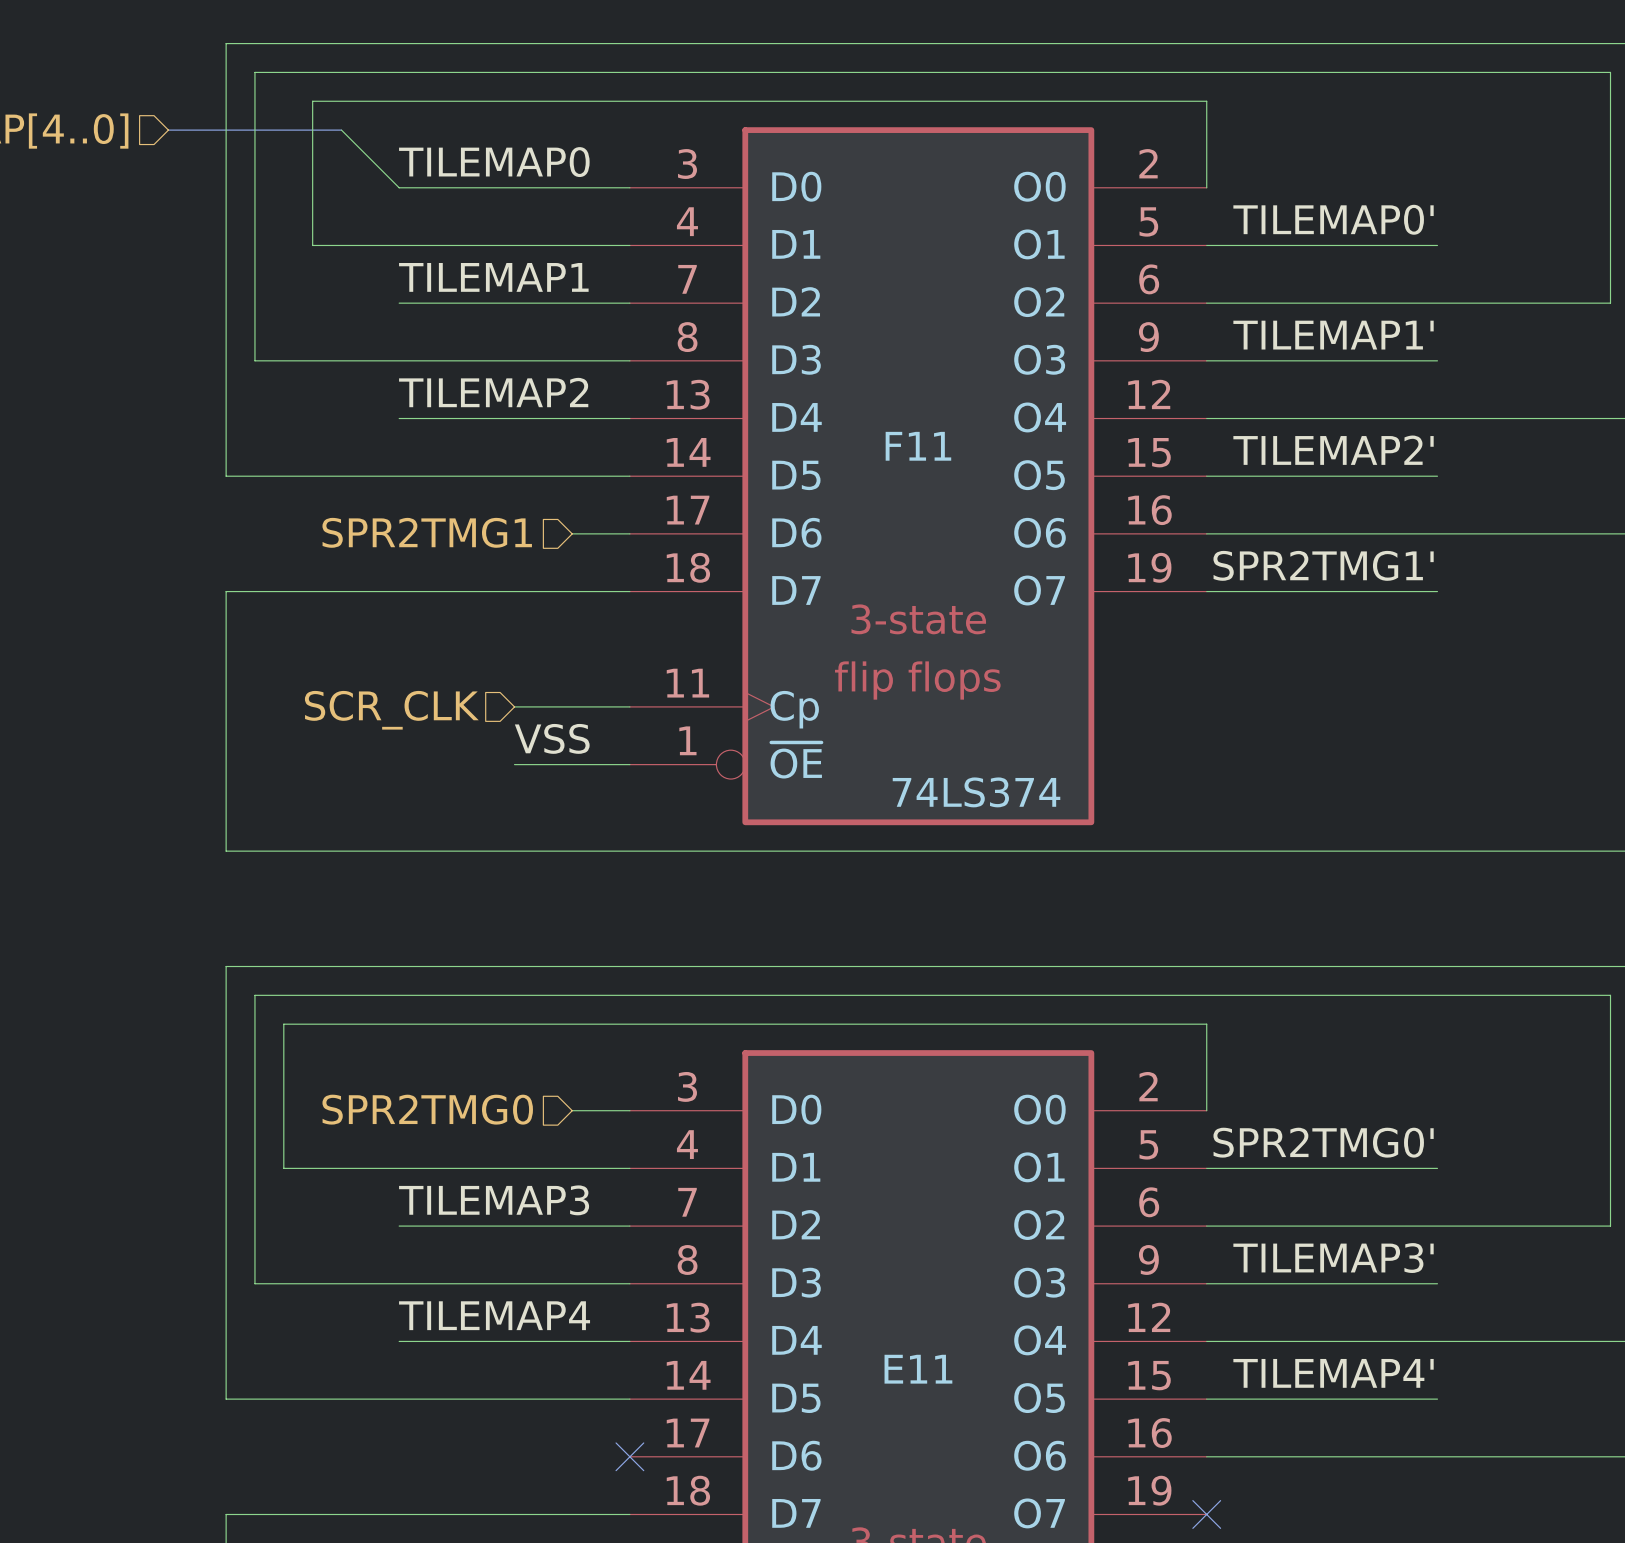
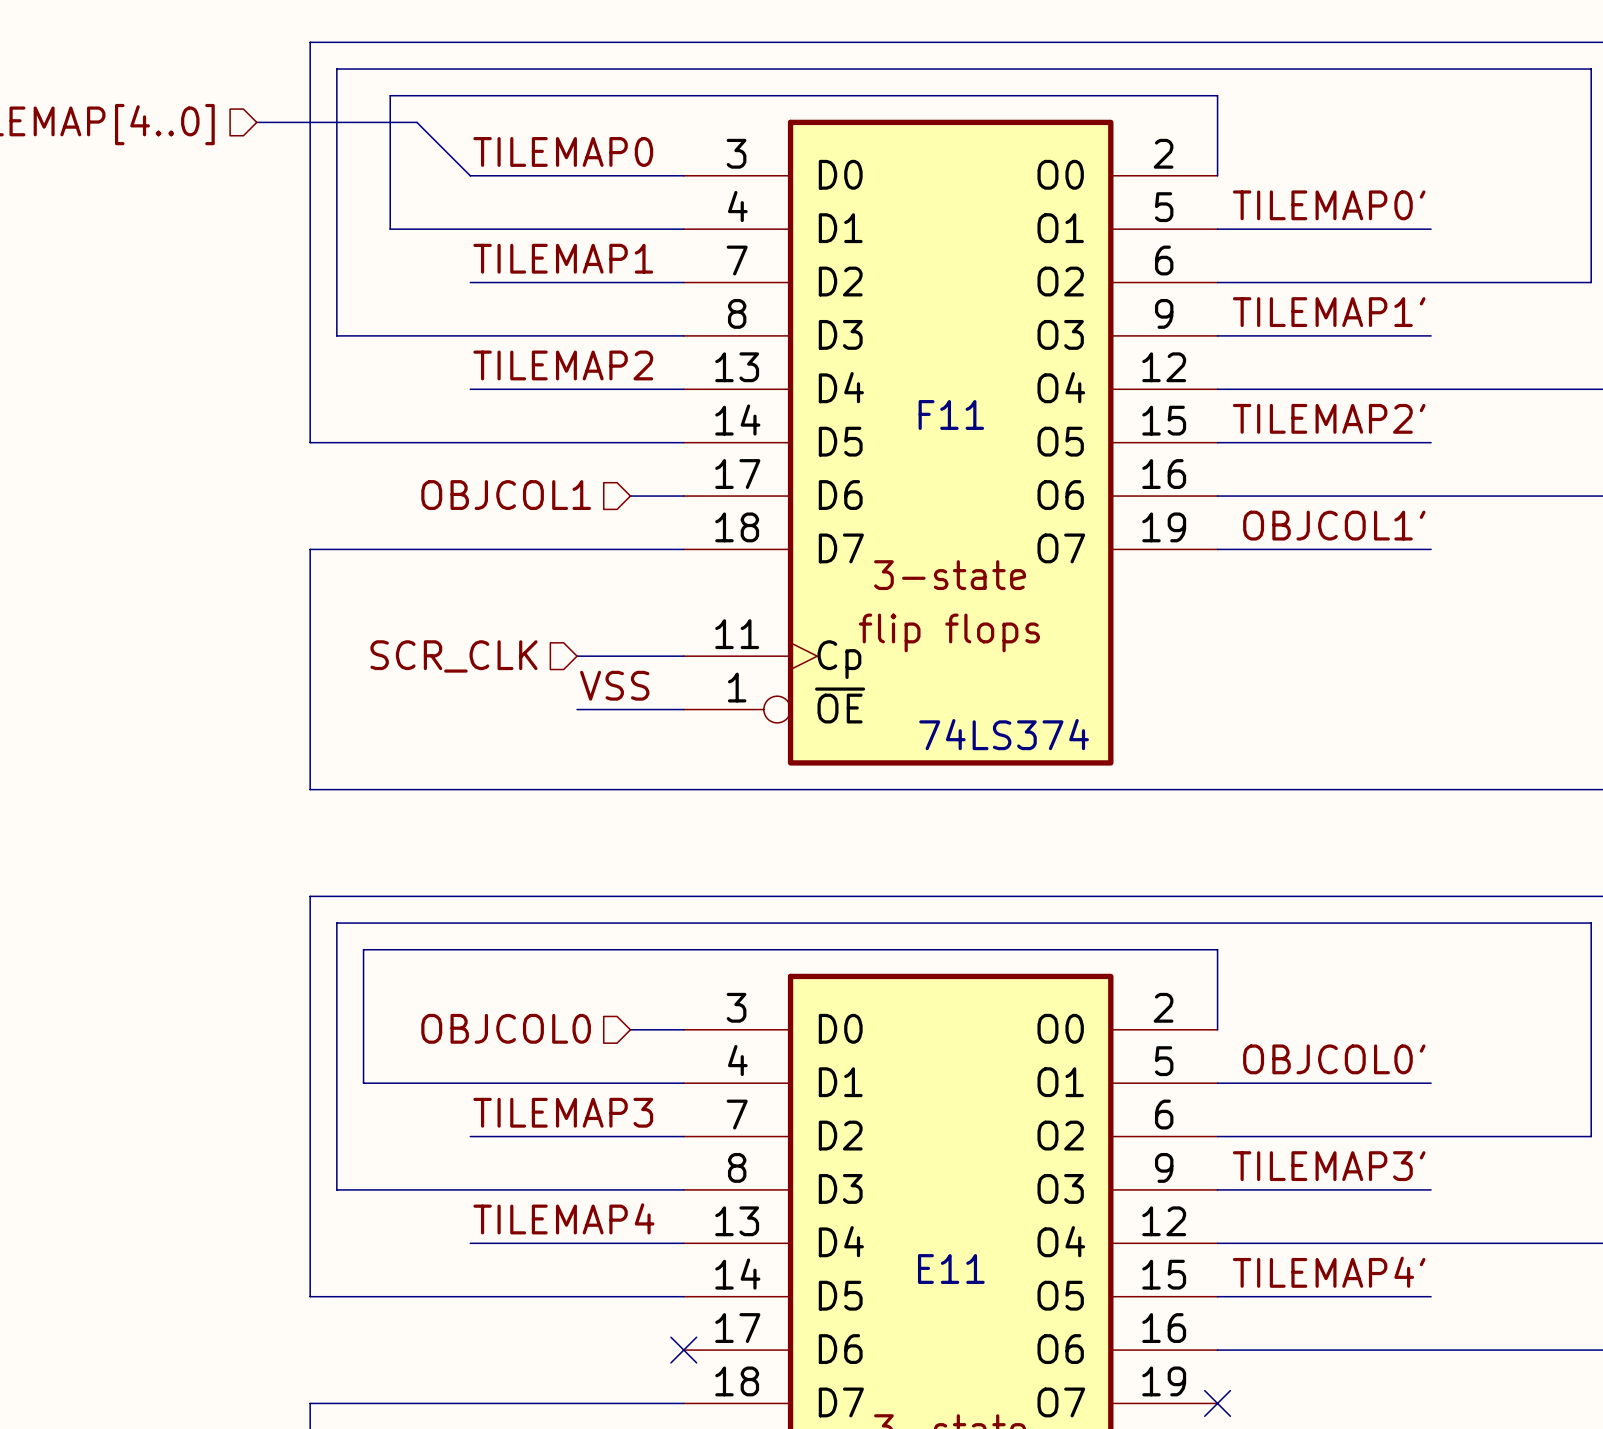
hierarchical label: SPR2TMG1 (427, 532) -> OBJCOL1 (506, 495)
label: SPR2TMG1' (1323, 565) -> OBJCOL1' (1334, 525)
hierarchical label: SPR2TMG0 (427, 1109) -> OBJCOL0 (506, 1028)
label: SPR2TMG0' (1323, 1142) -> OBJCOL0' (1334, 1059)

